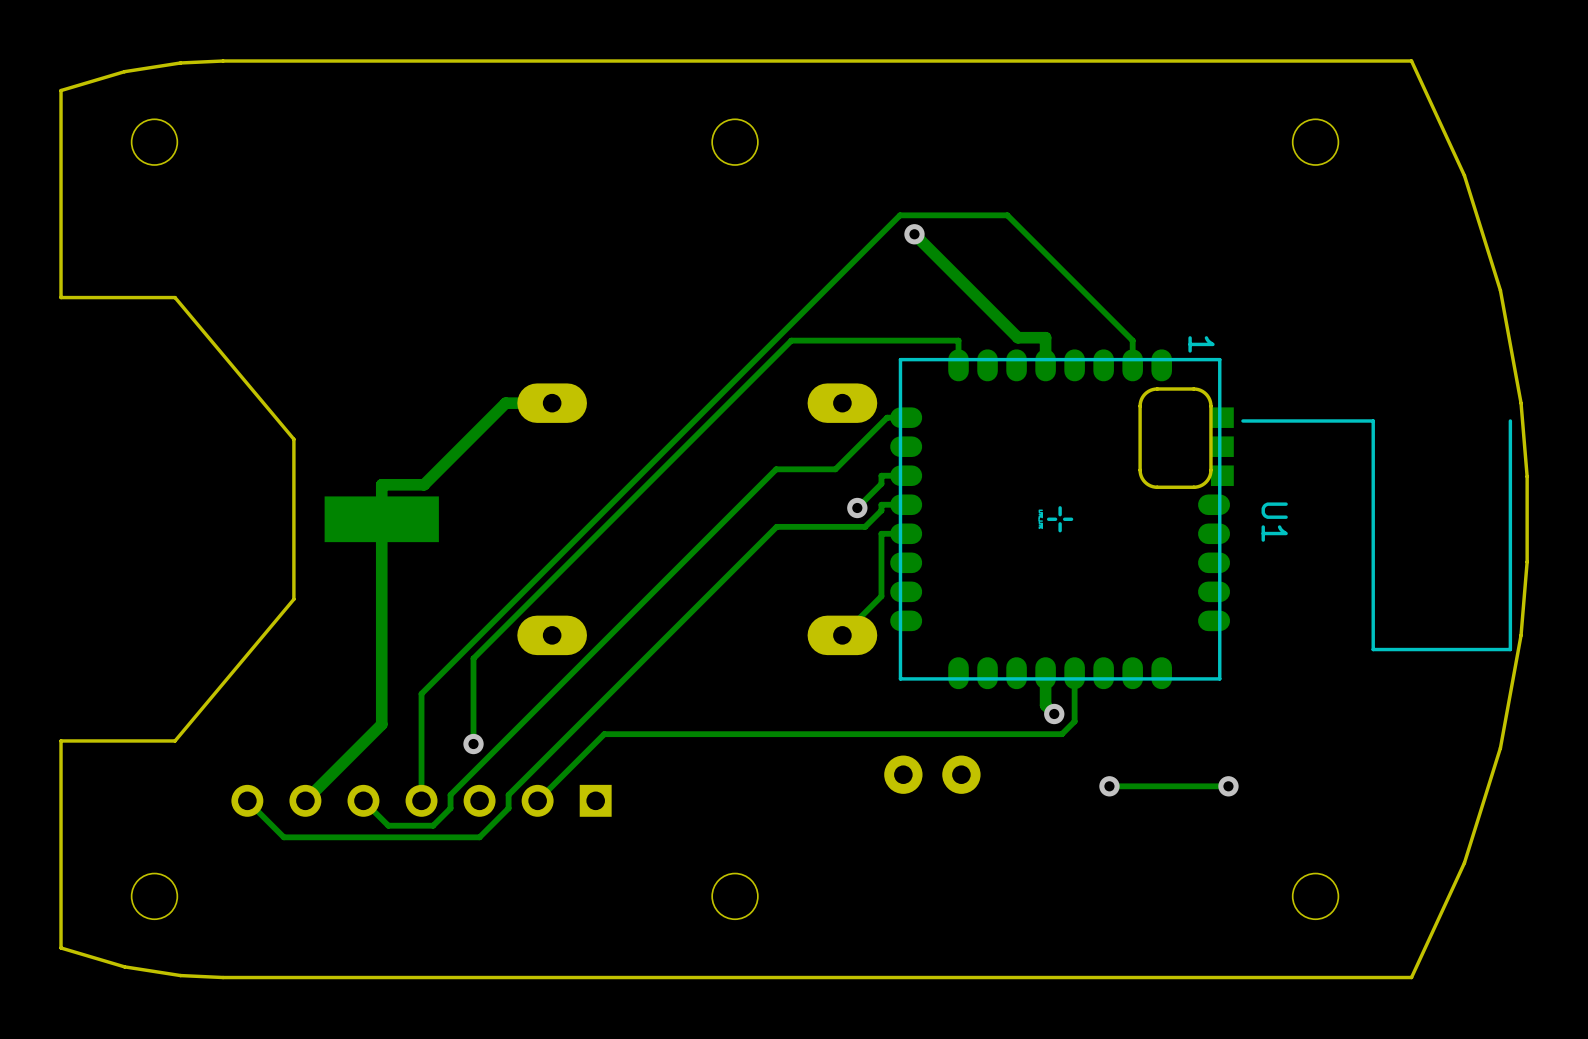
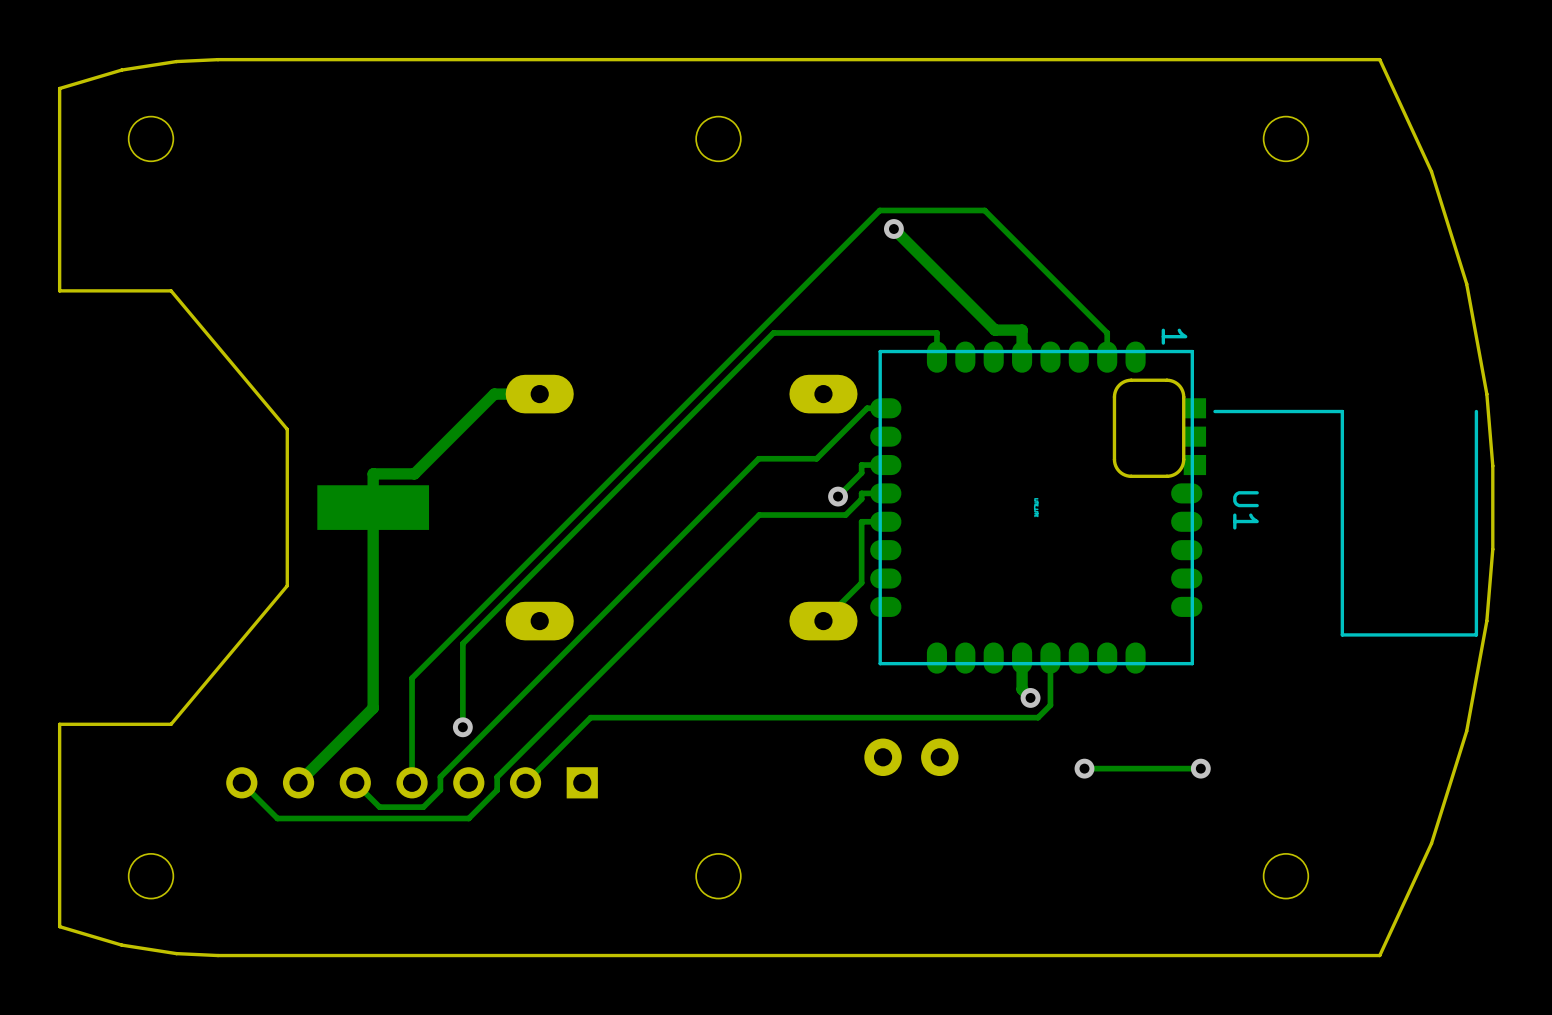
U1 footprint: [890, 349, 1513, 690] -> [870, 341, 1479, 674]

